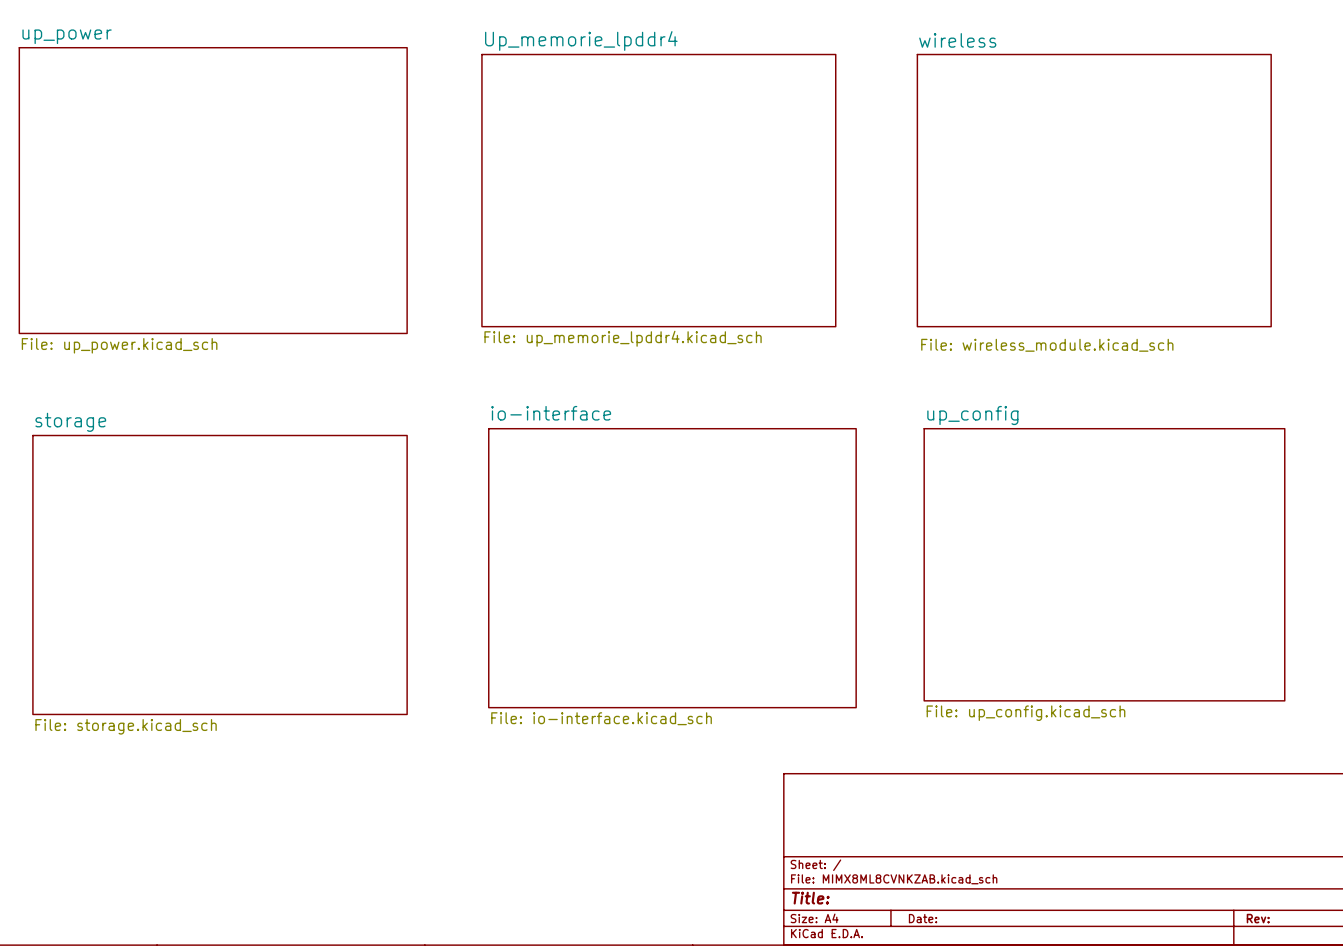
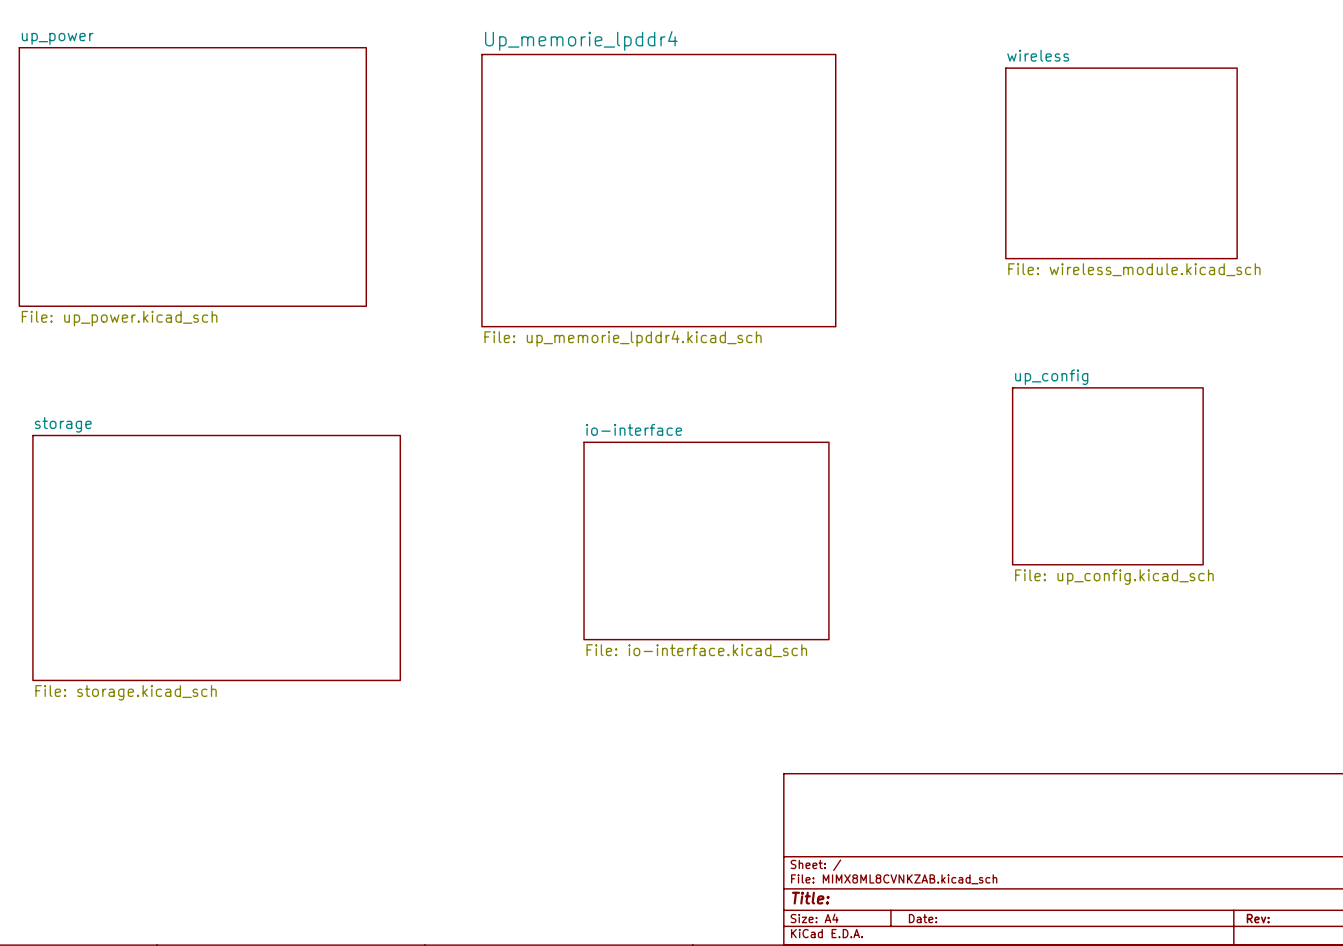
sheet wireless: none -> File: wireless_module.kicad_sch (1121, 163)
sheet up_power: none -> File: up_power.kicad_sch (192, 176)
sheet up_power: File: up_power.kicad_sch (213, 190) -> none
sheet wireless: File: wireless_module.kicad_sch (1094, 190) -> none
sheet up_config: none -> File: up_config.kicad_sch (1107, 476)
sheet io-interface: none -> File: io-interface.kicad_sch (706, 540)
sheet storage: none -> File: storage.kicad_sch (216, 557)
sheet up_config: File: up_config.kicad_sch (1104, 564) -> none
sheet io-interface: File: io-interface.kicad_sch (672, 568) -> none
sheet storage: File: storage.kicad_sch (220, 574) -> none

